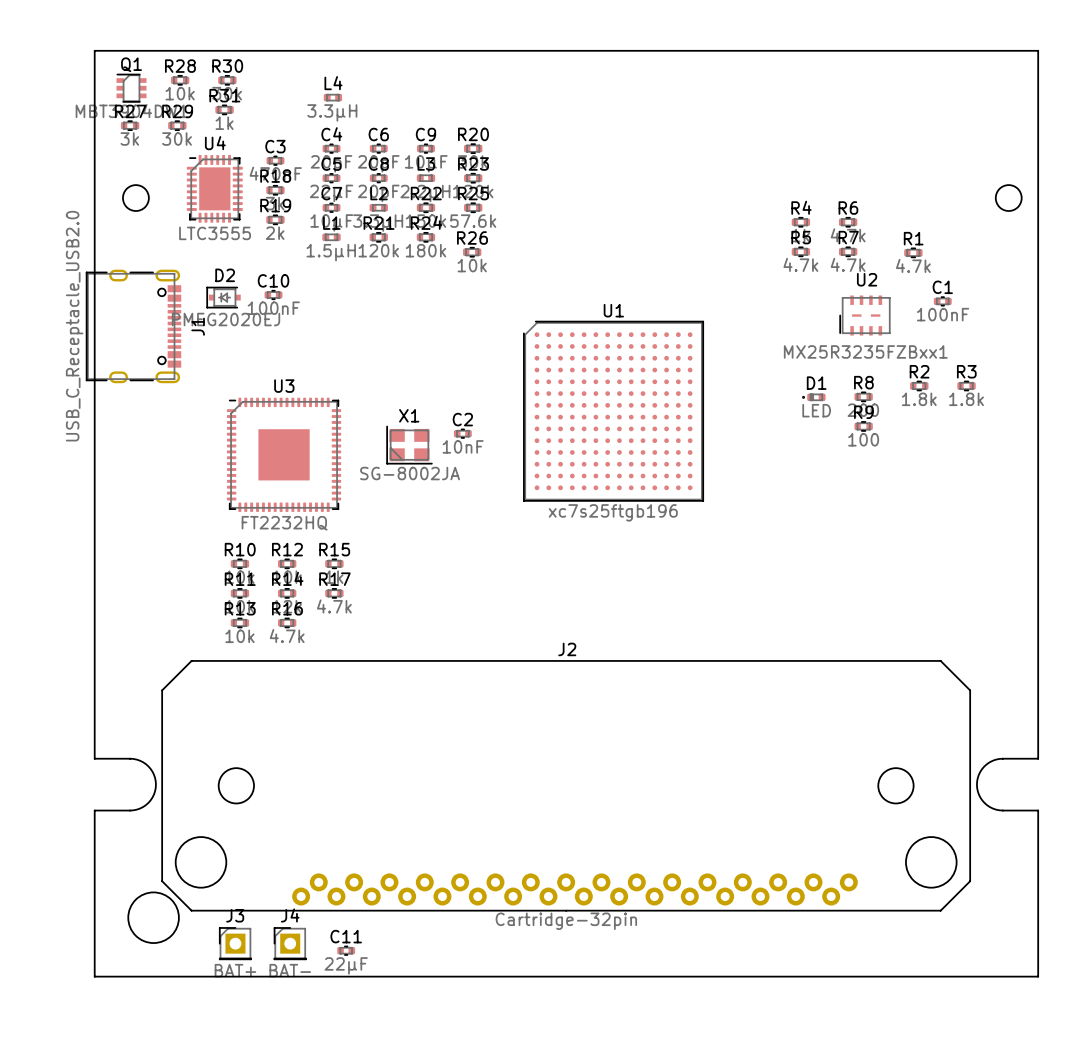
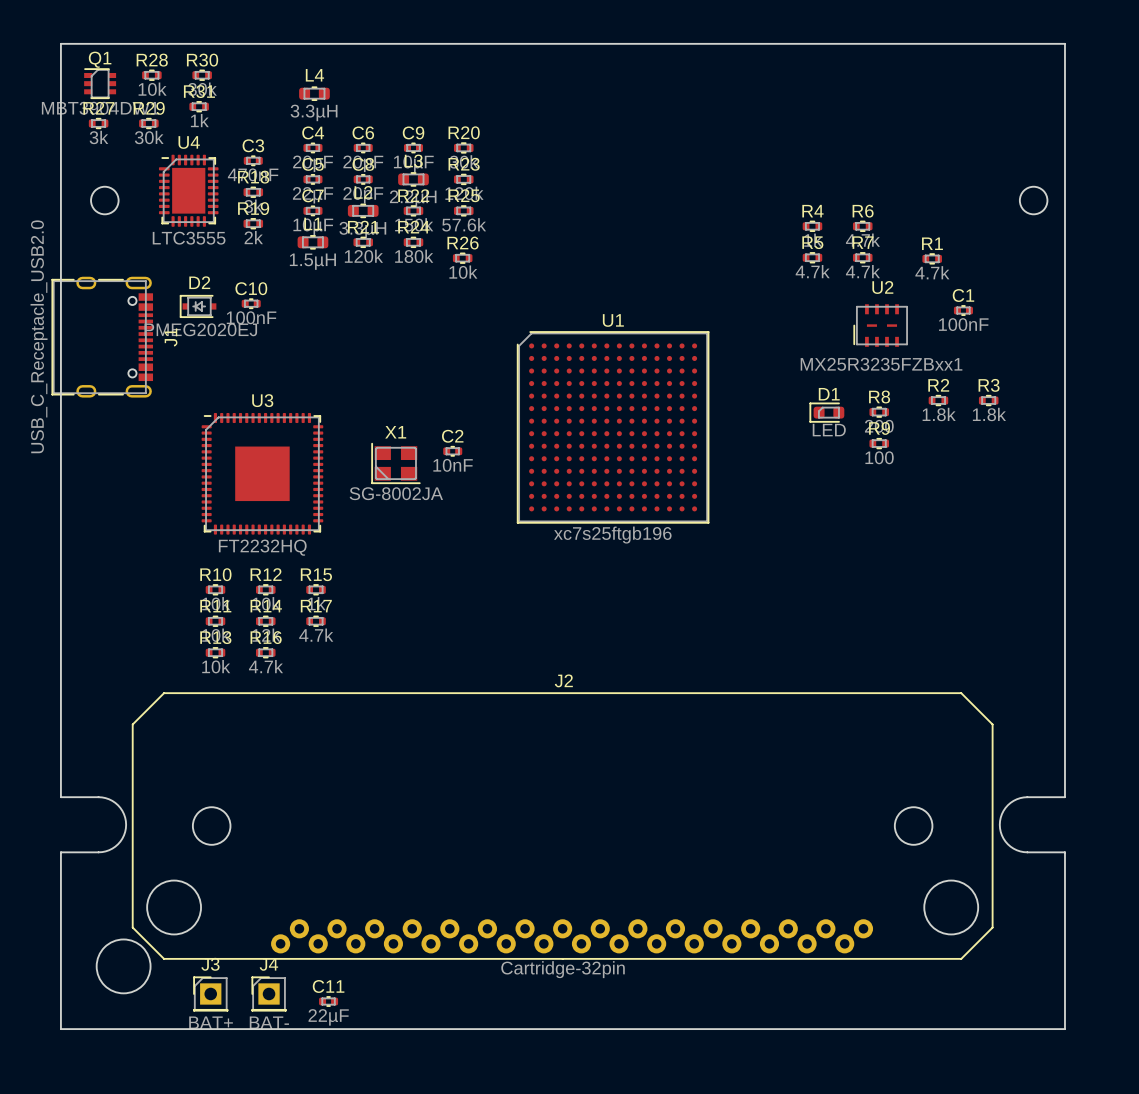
L4 footprint: [323, 93, 343, 102] -> [299, 86, 330, 101]
L3 footprint: [416, 174, 436, 182] -> [398, 172, 429, 187]
L2 footprint: [369, 203, 388, 212] -> [347, 203, 379, 219]
L1 footprint: [322, 233, 341, 242] -> [297, 235, 329, 250]
D1 footprint: [802, 393, 826, 402] -> [809, 402, 845, 423]

